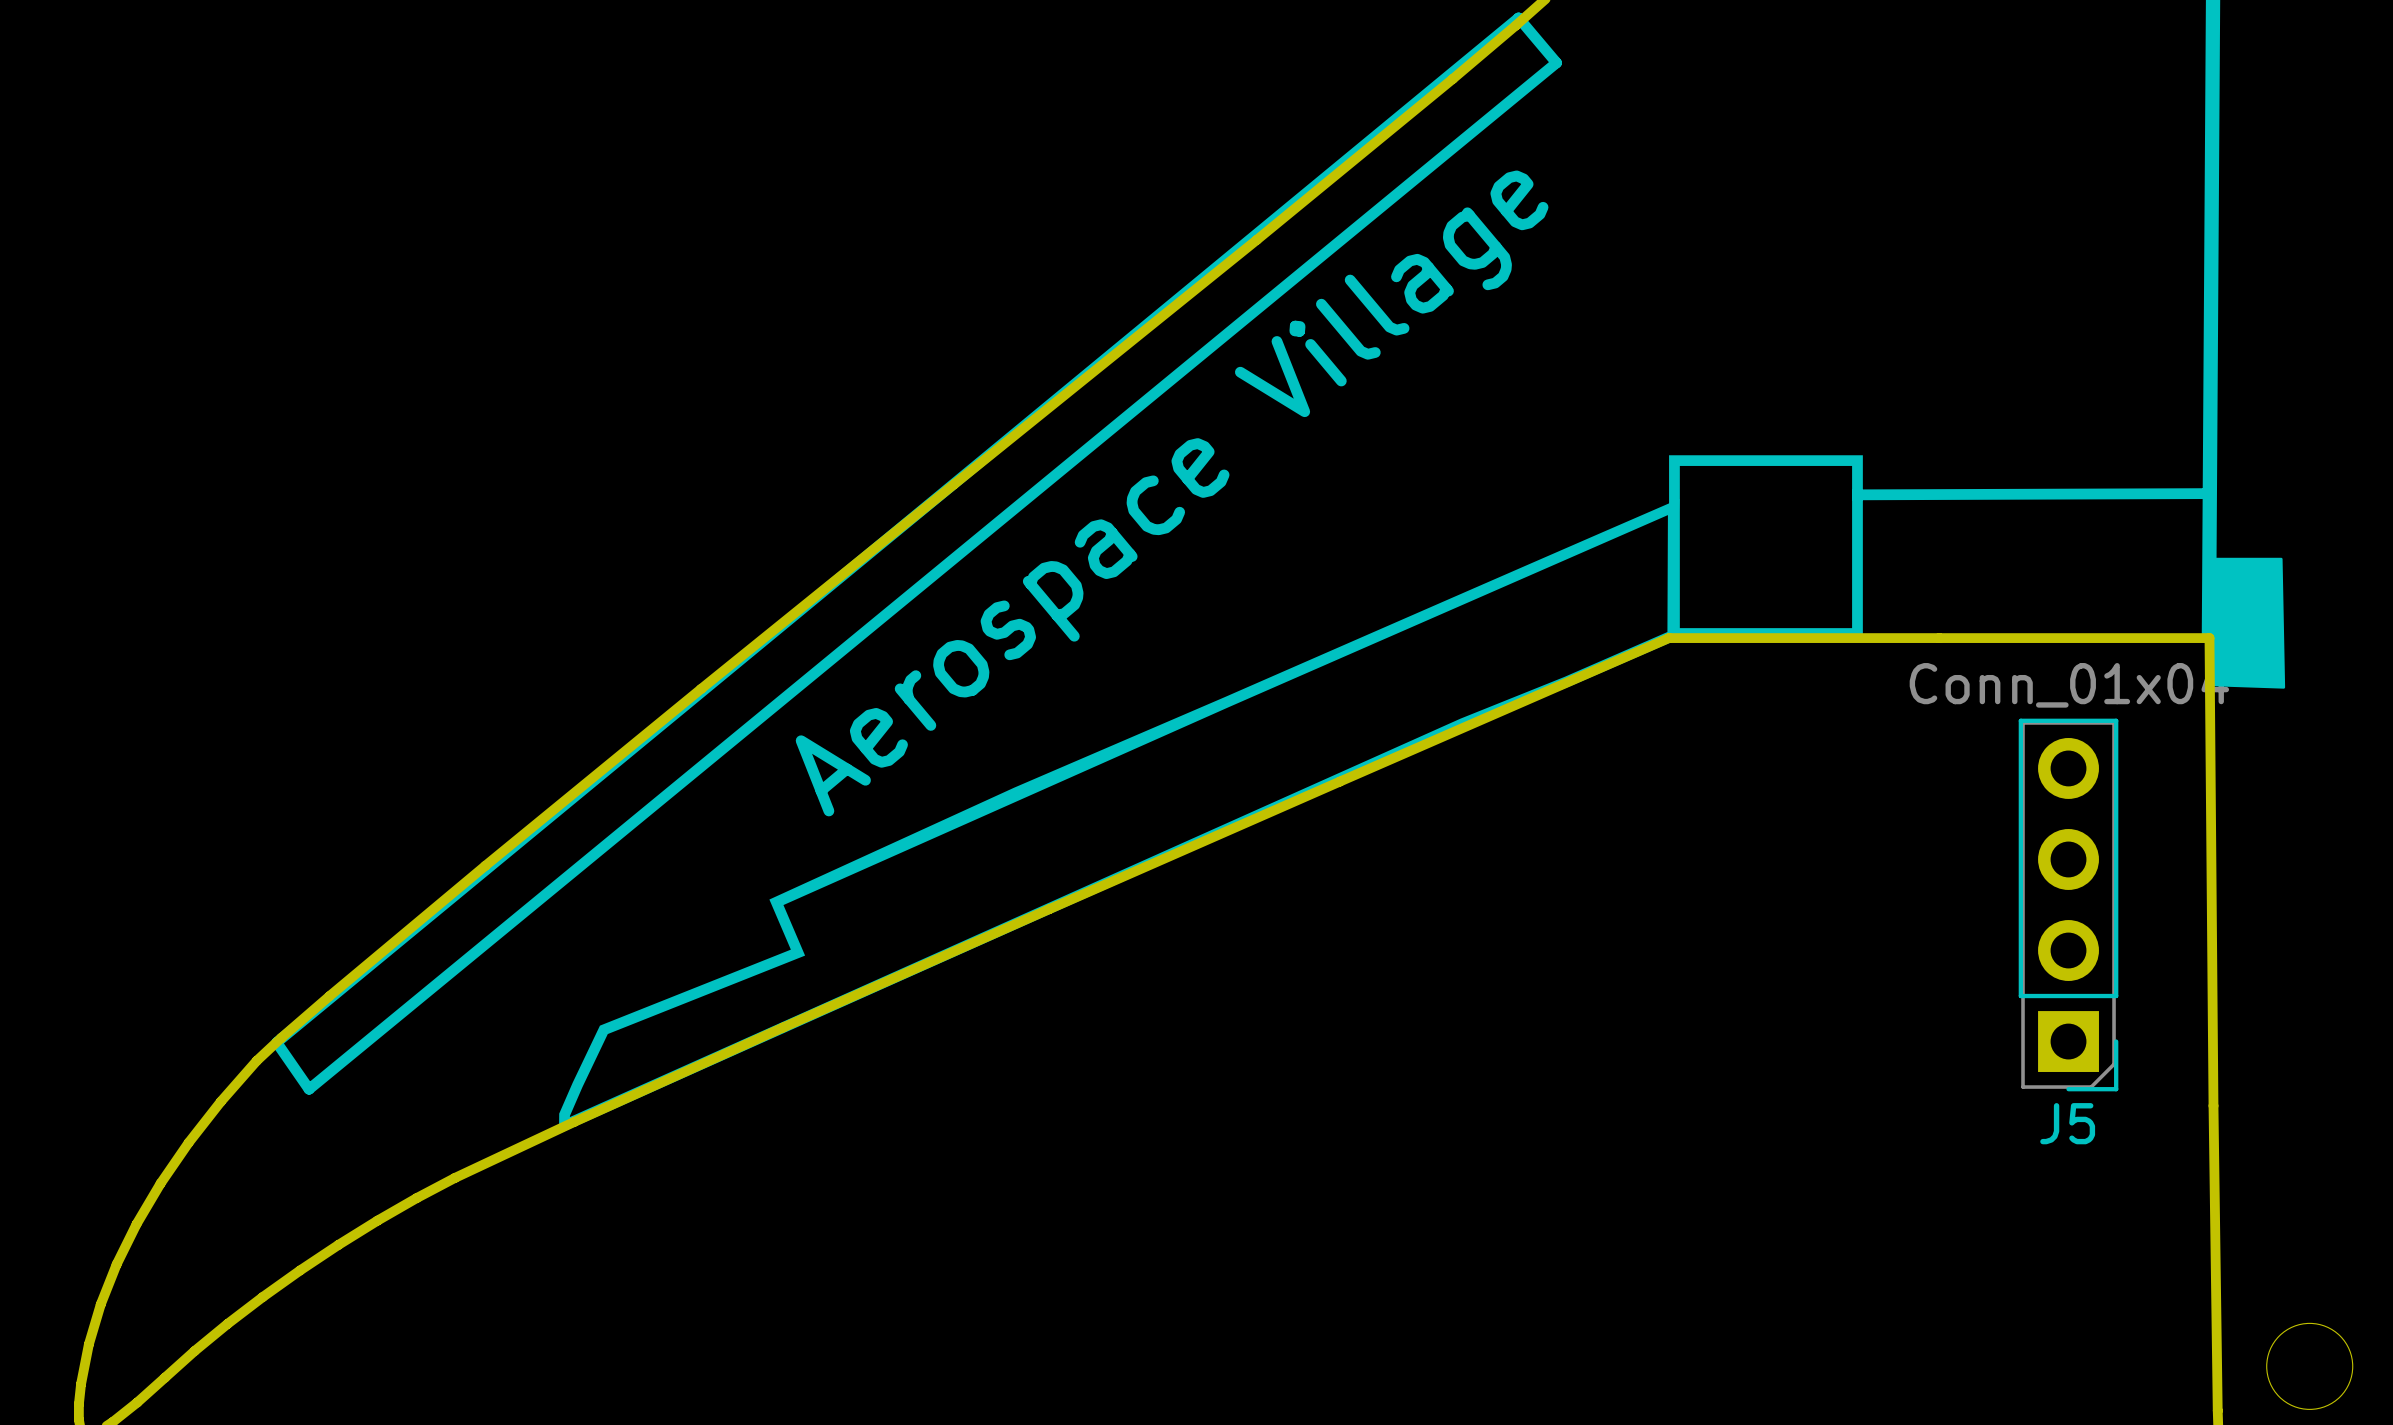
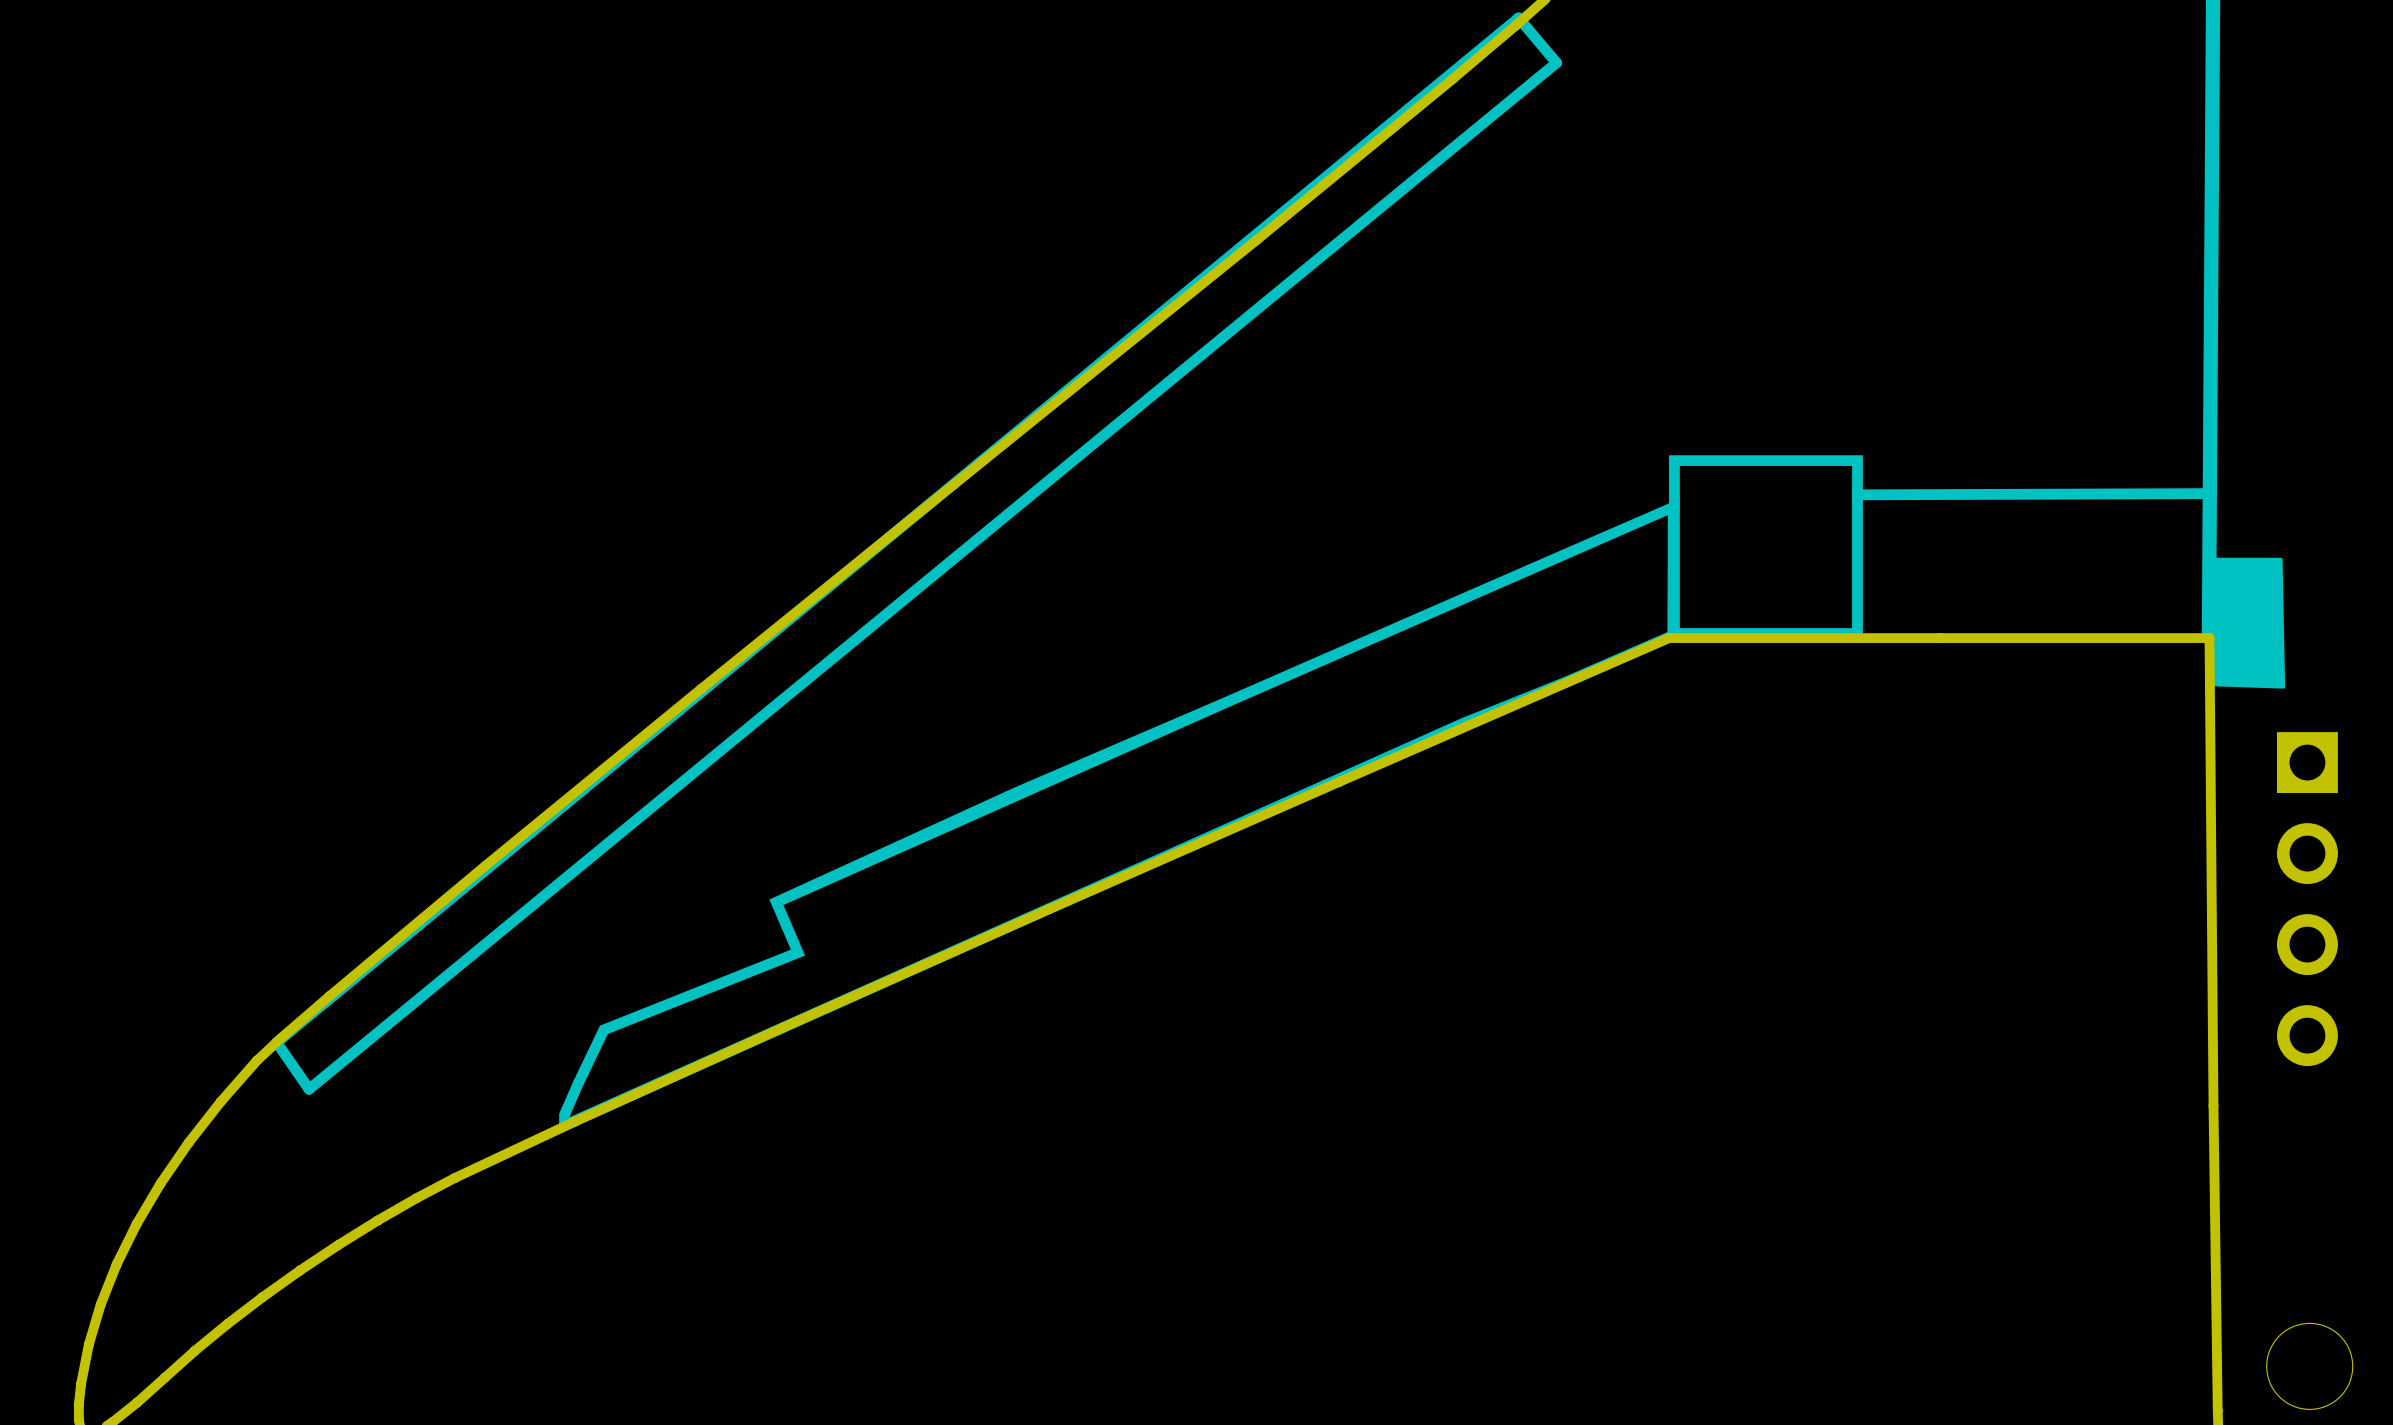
text: Aerospace Village (1172, 493) -> none
J5 side: top (2068, 904) -> bottom (2307, 899)

